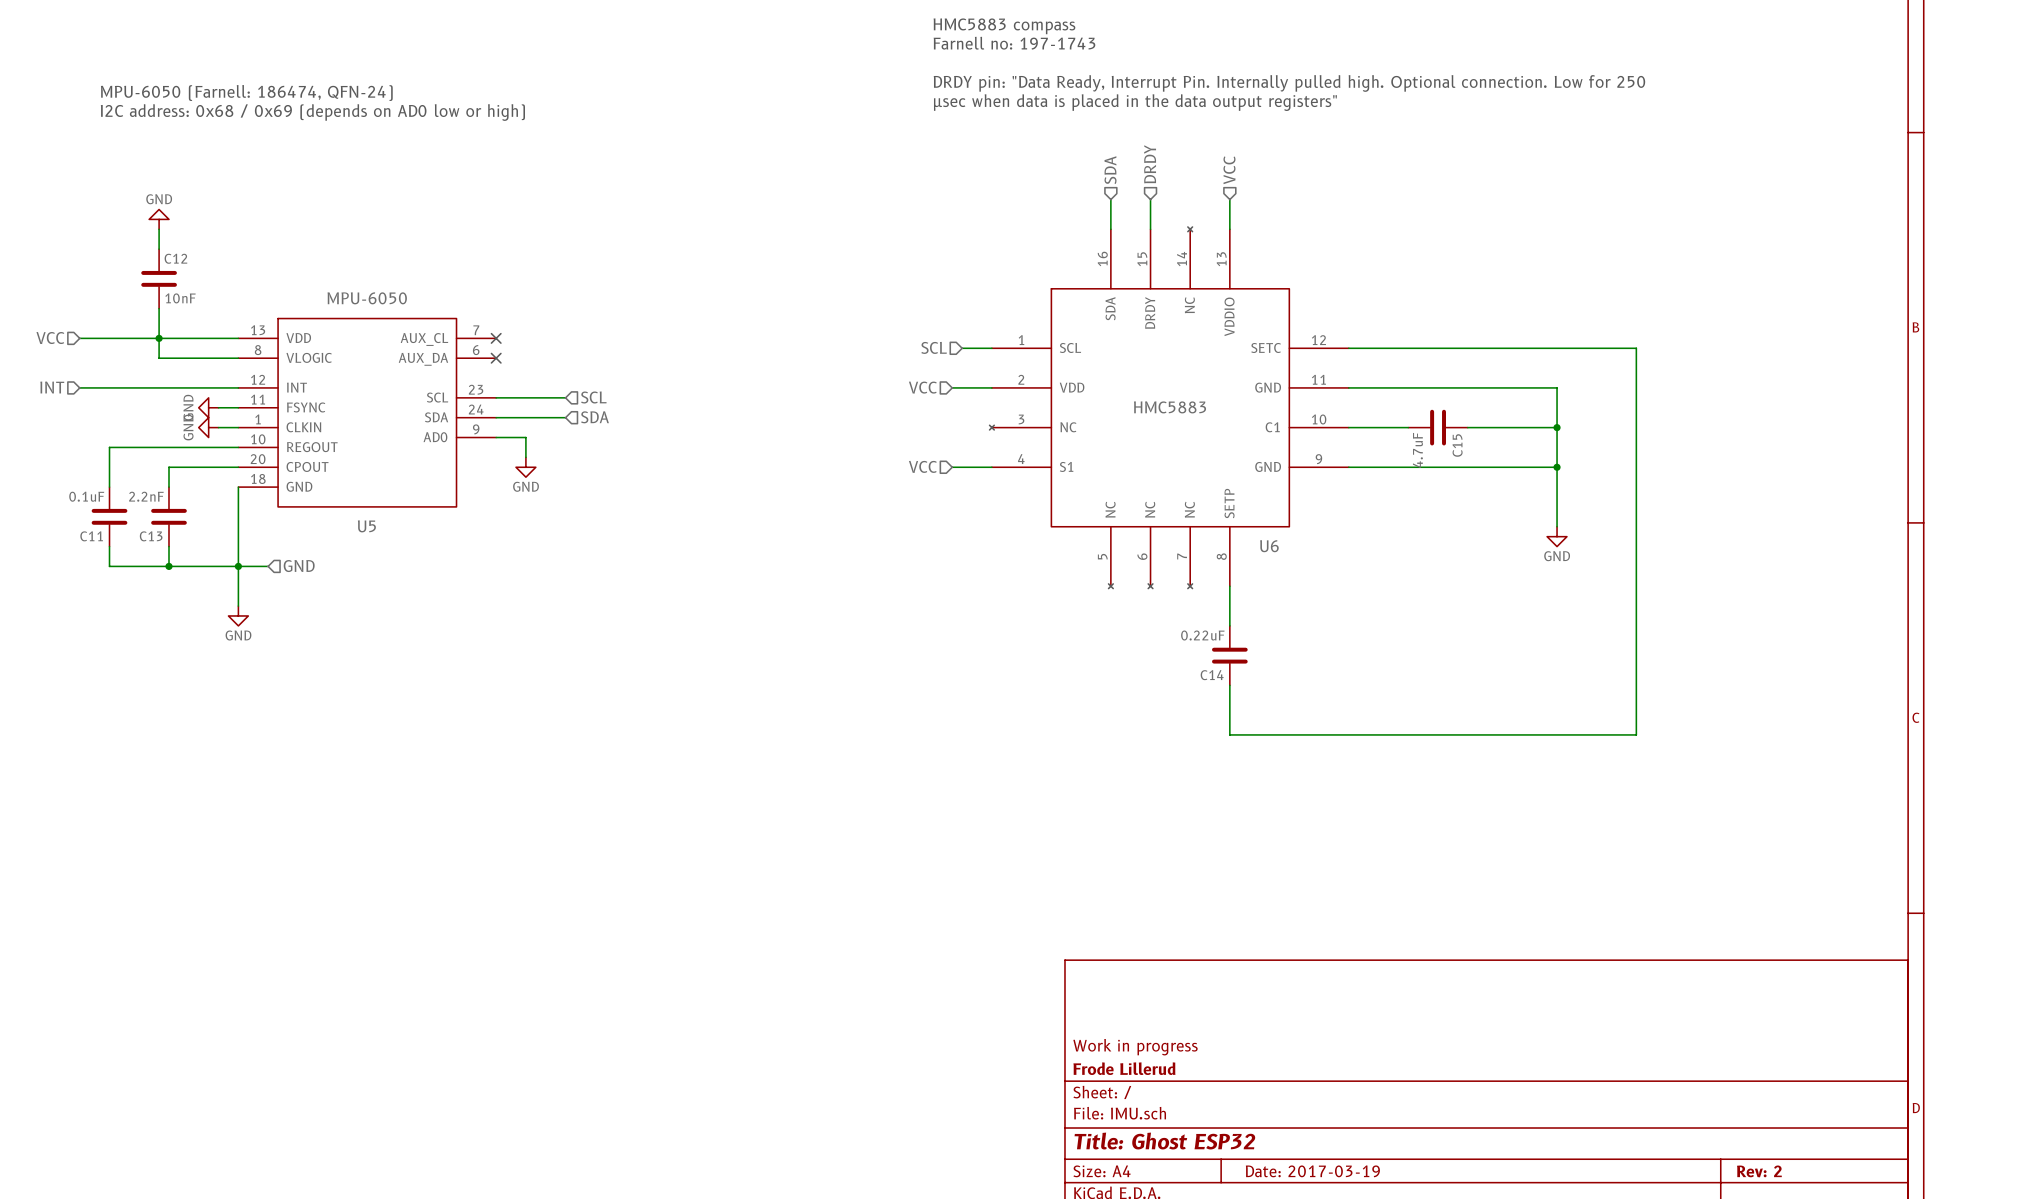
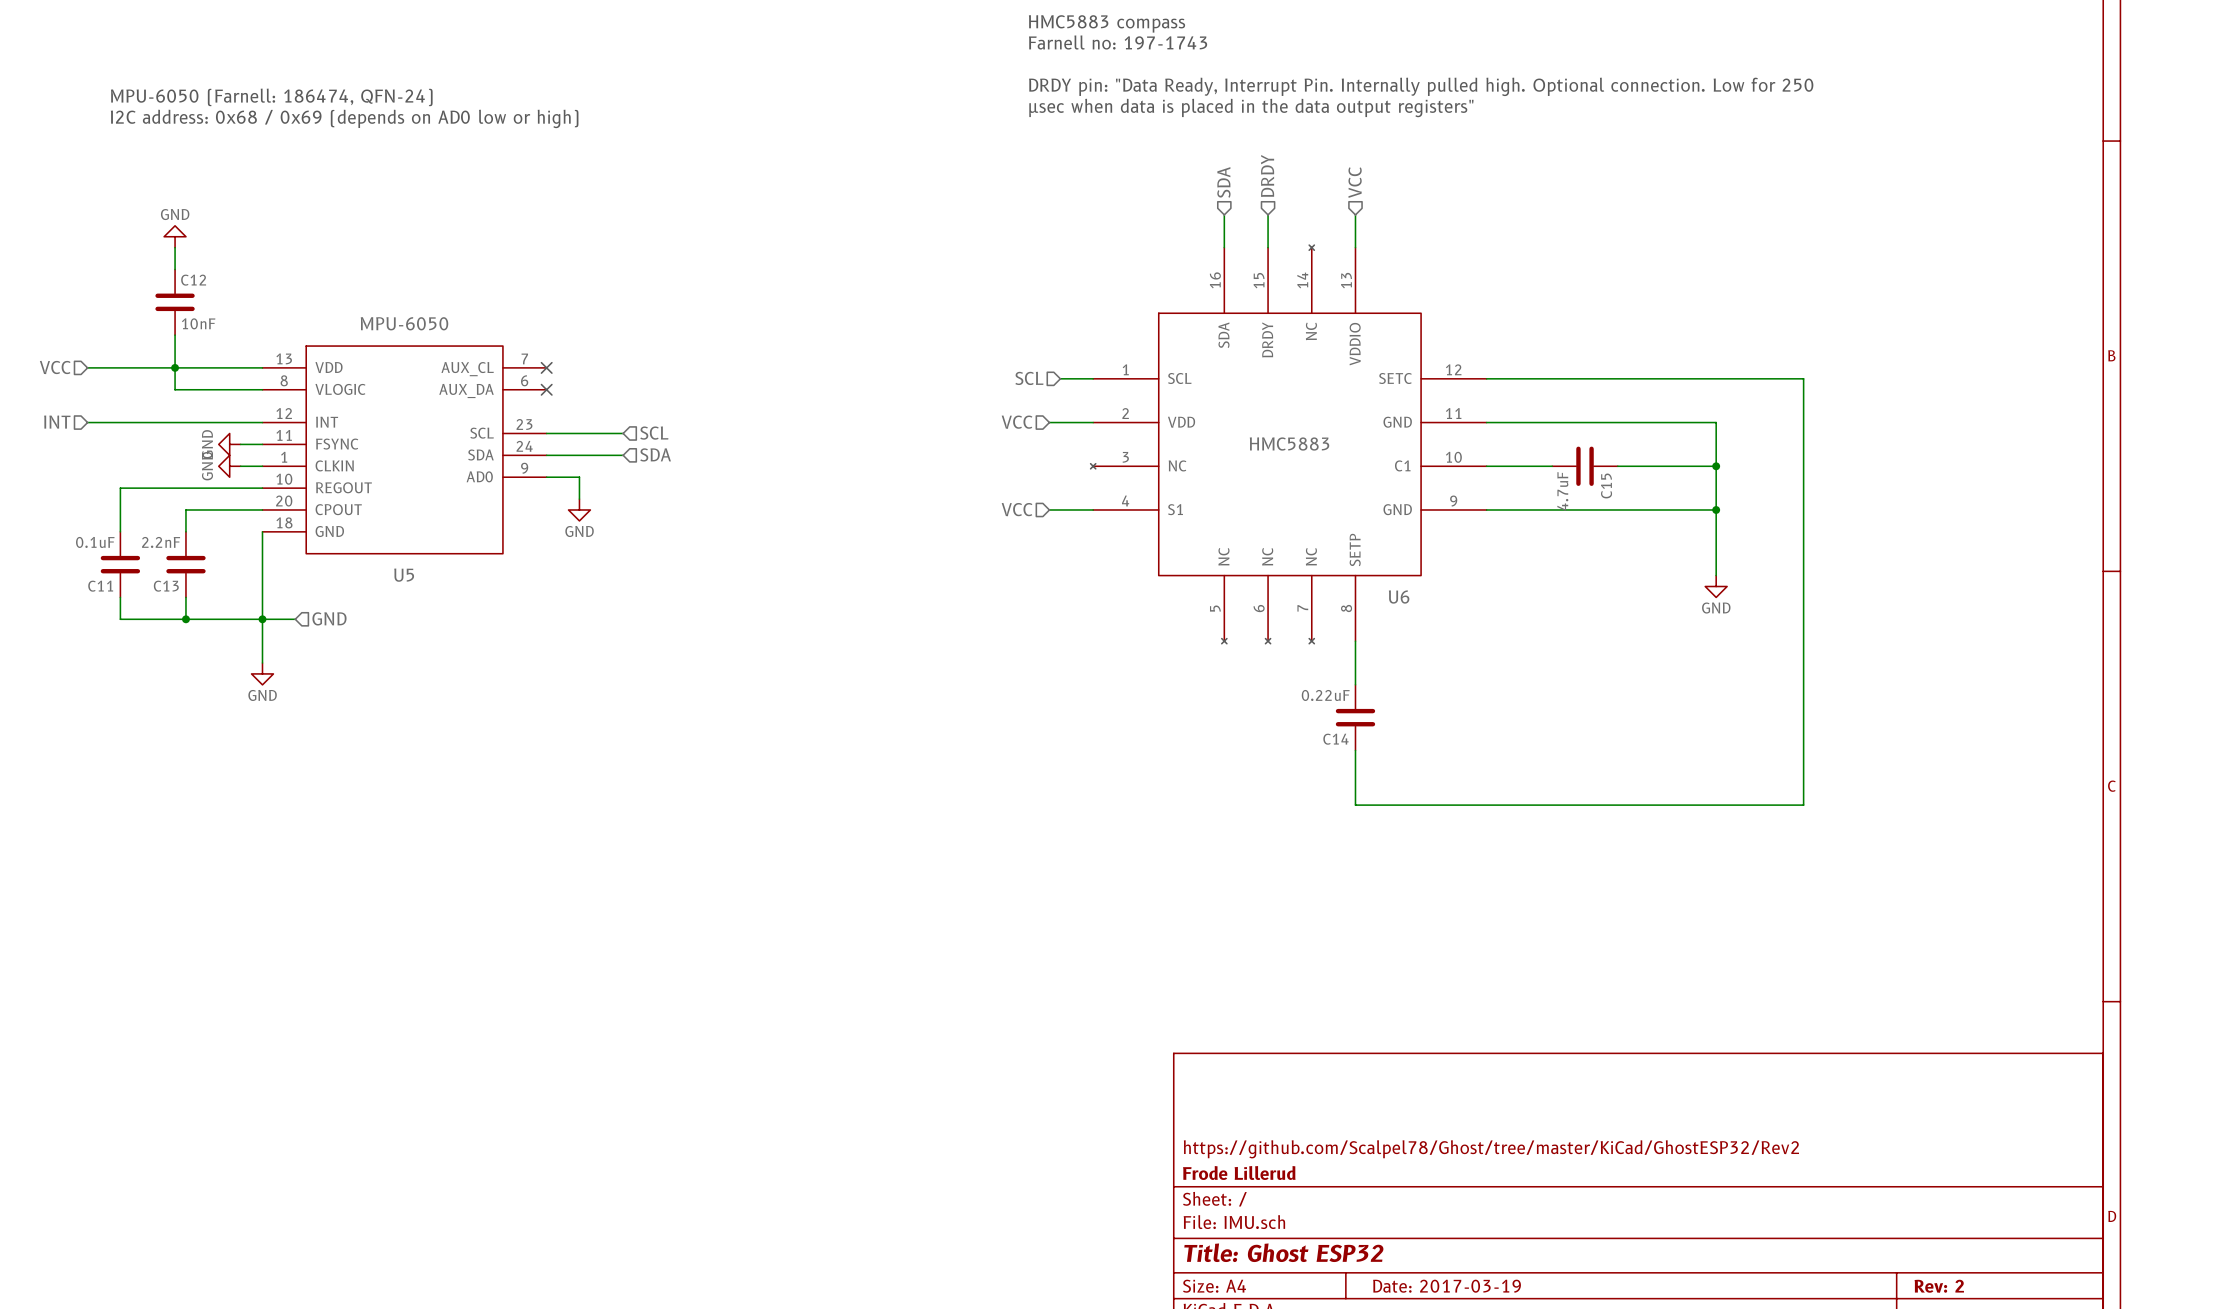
title block: Work in progress (1135, 1047) -> https://github.com/Scalpel78/Ghost/tree/master/KiCad/GhostESP32/Rev2 (1491, 1149)

